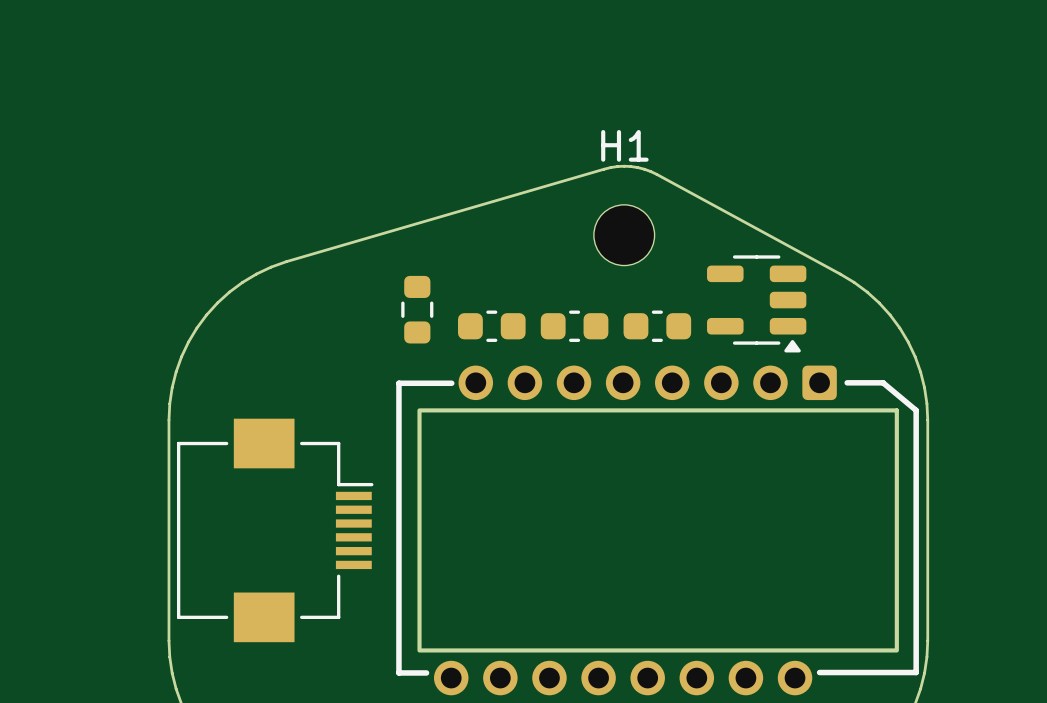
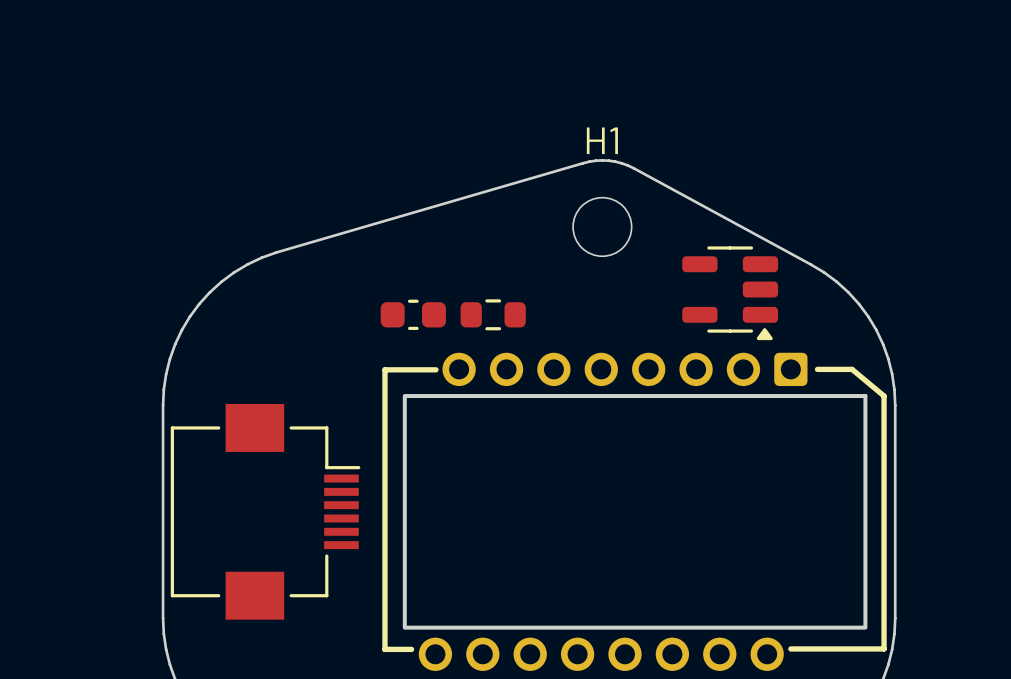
part footprint: [401, 275, 434, 344] -> [380, 299, 446, 330]
part footprint: [458, 310, 526, 342] -> [460, 299, 526, 331]
part: (574, 326) -> none
part: (657, 326) -> none

